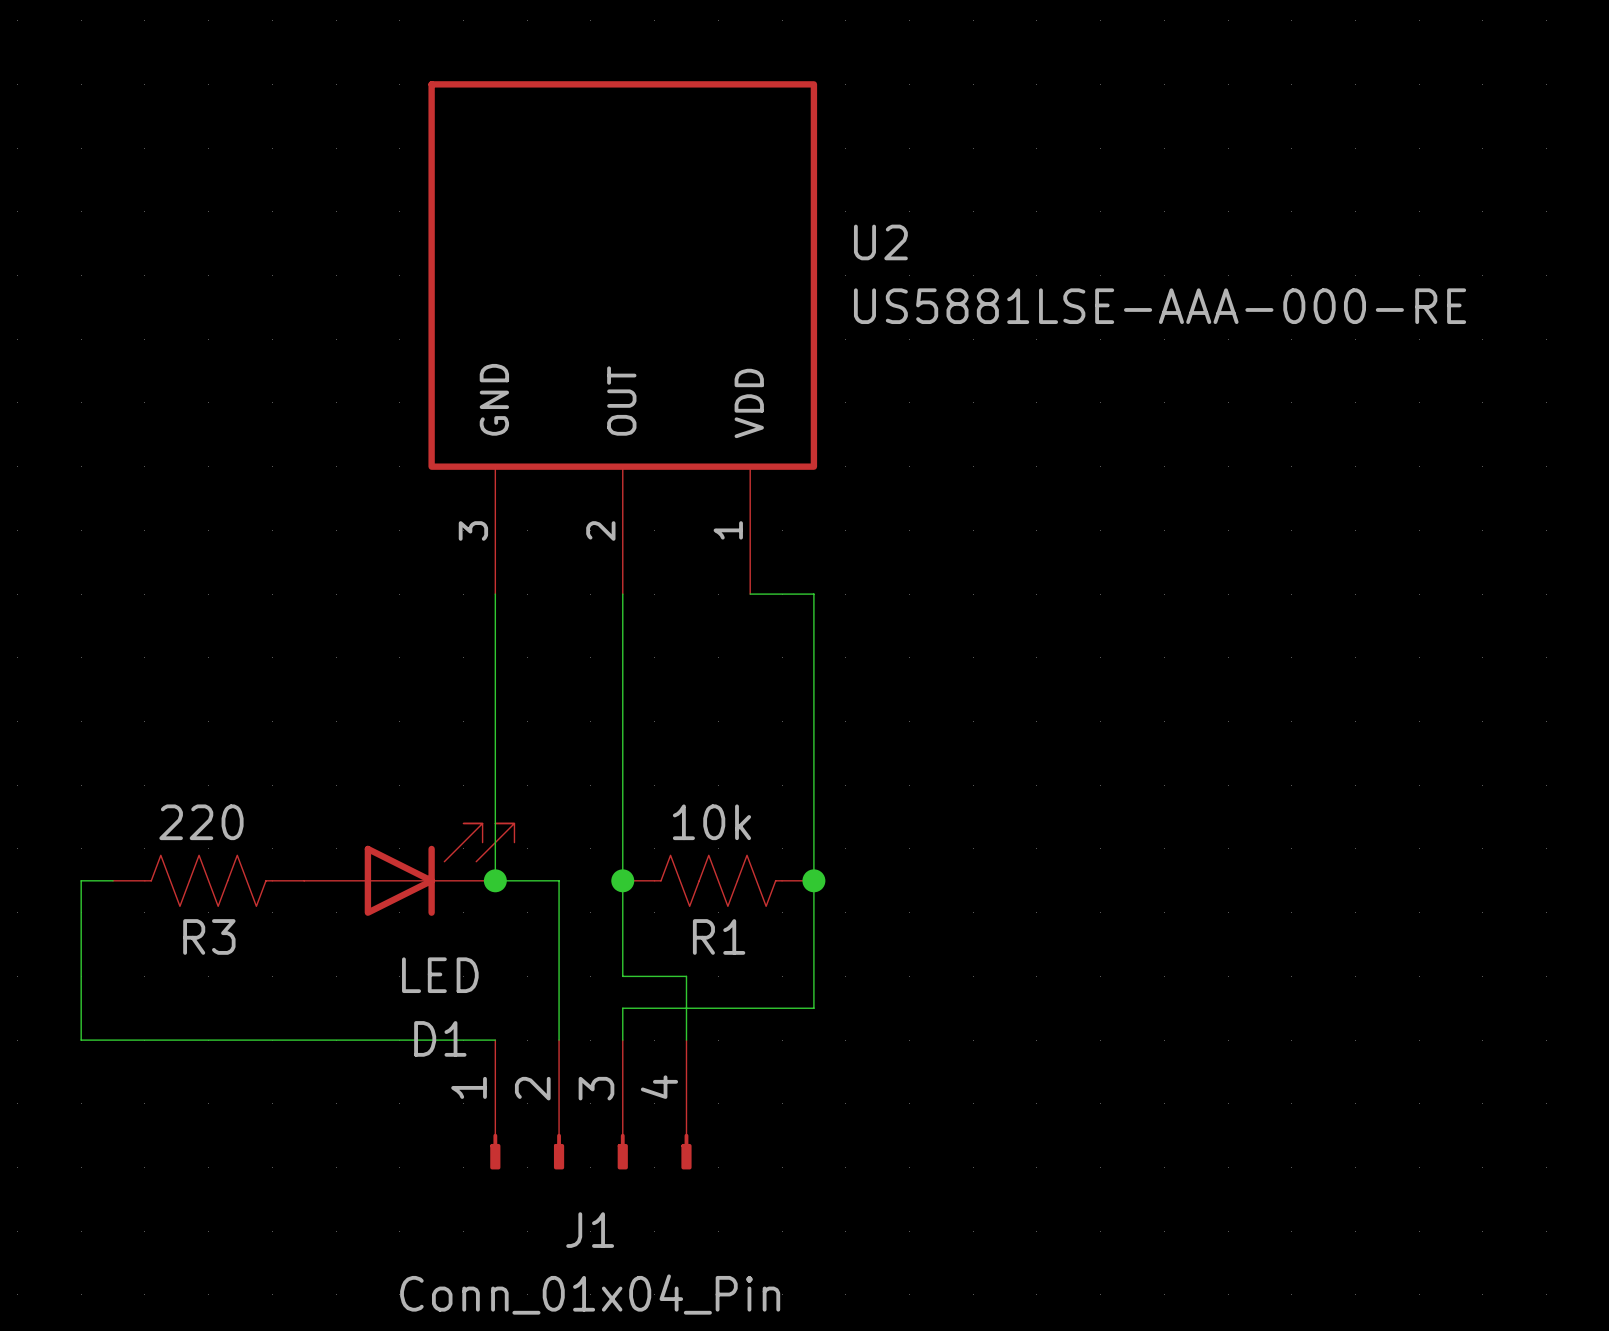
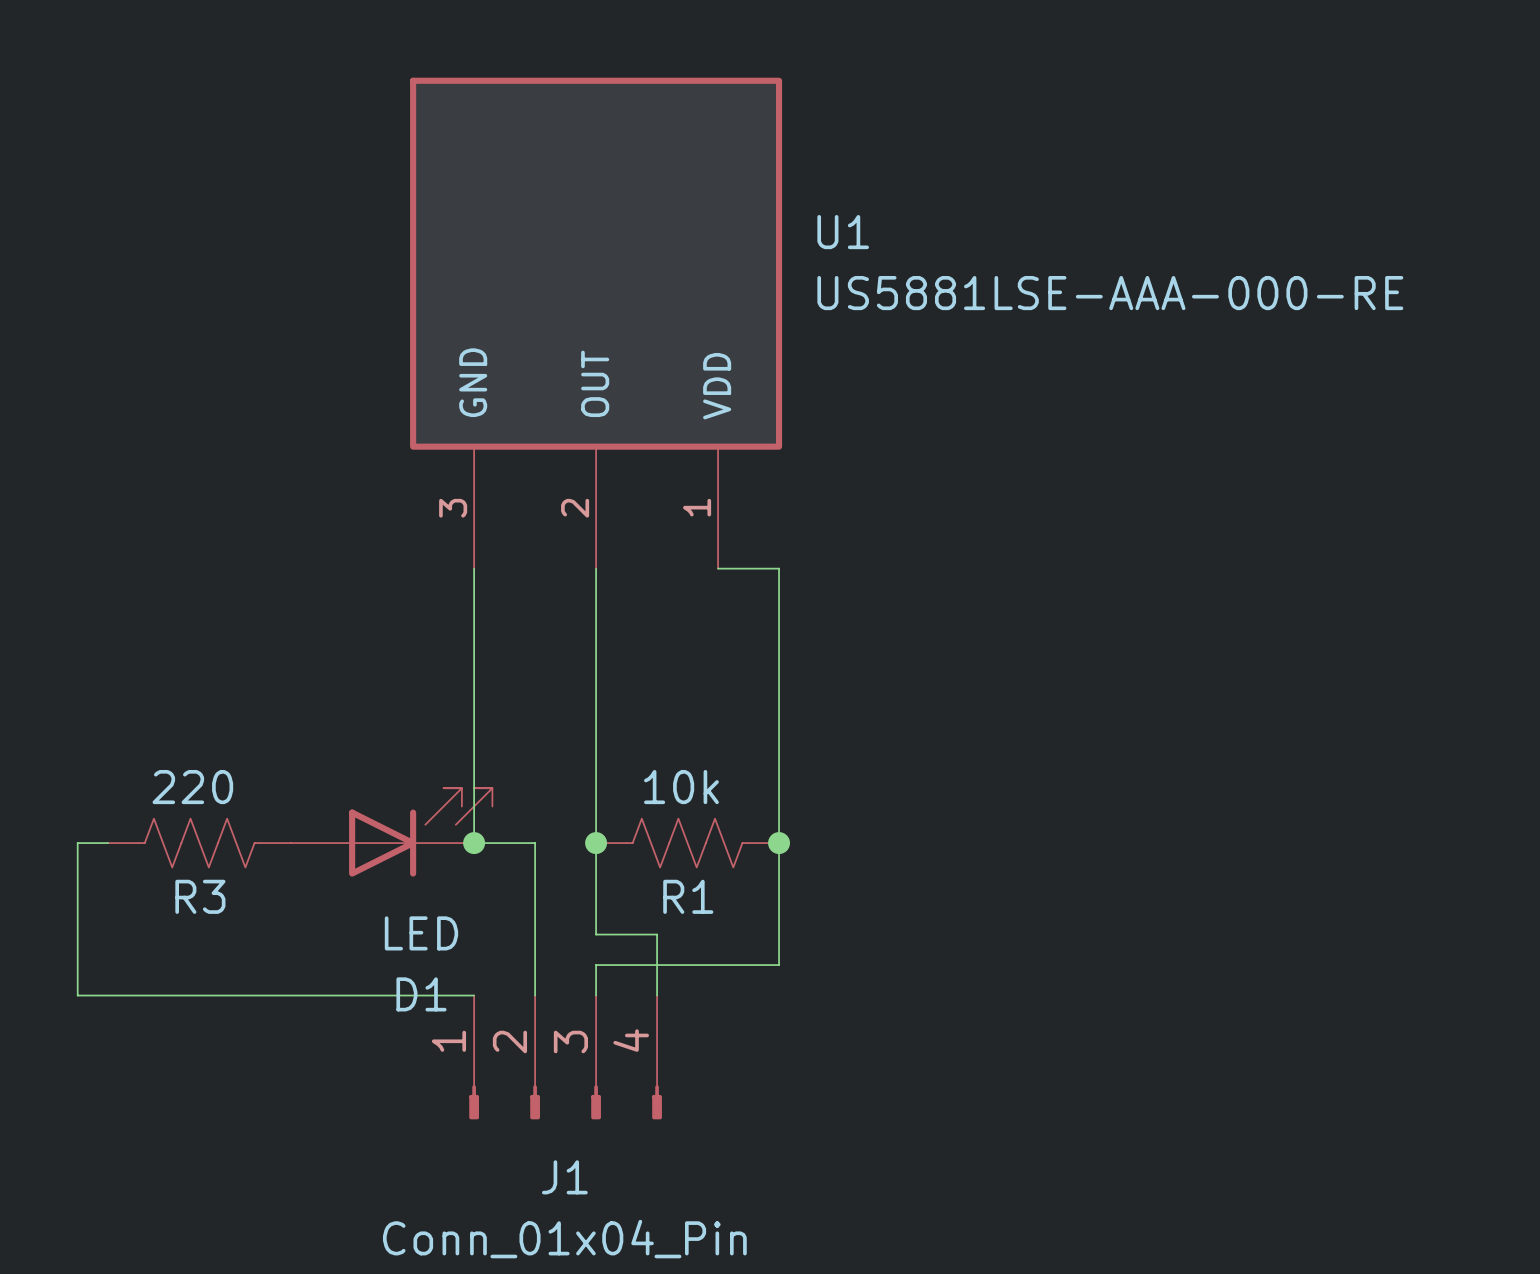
U2 name: U2 (880, 242) -> U1 (843, 232)

